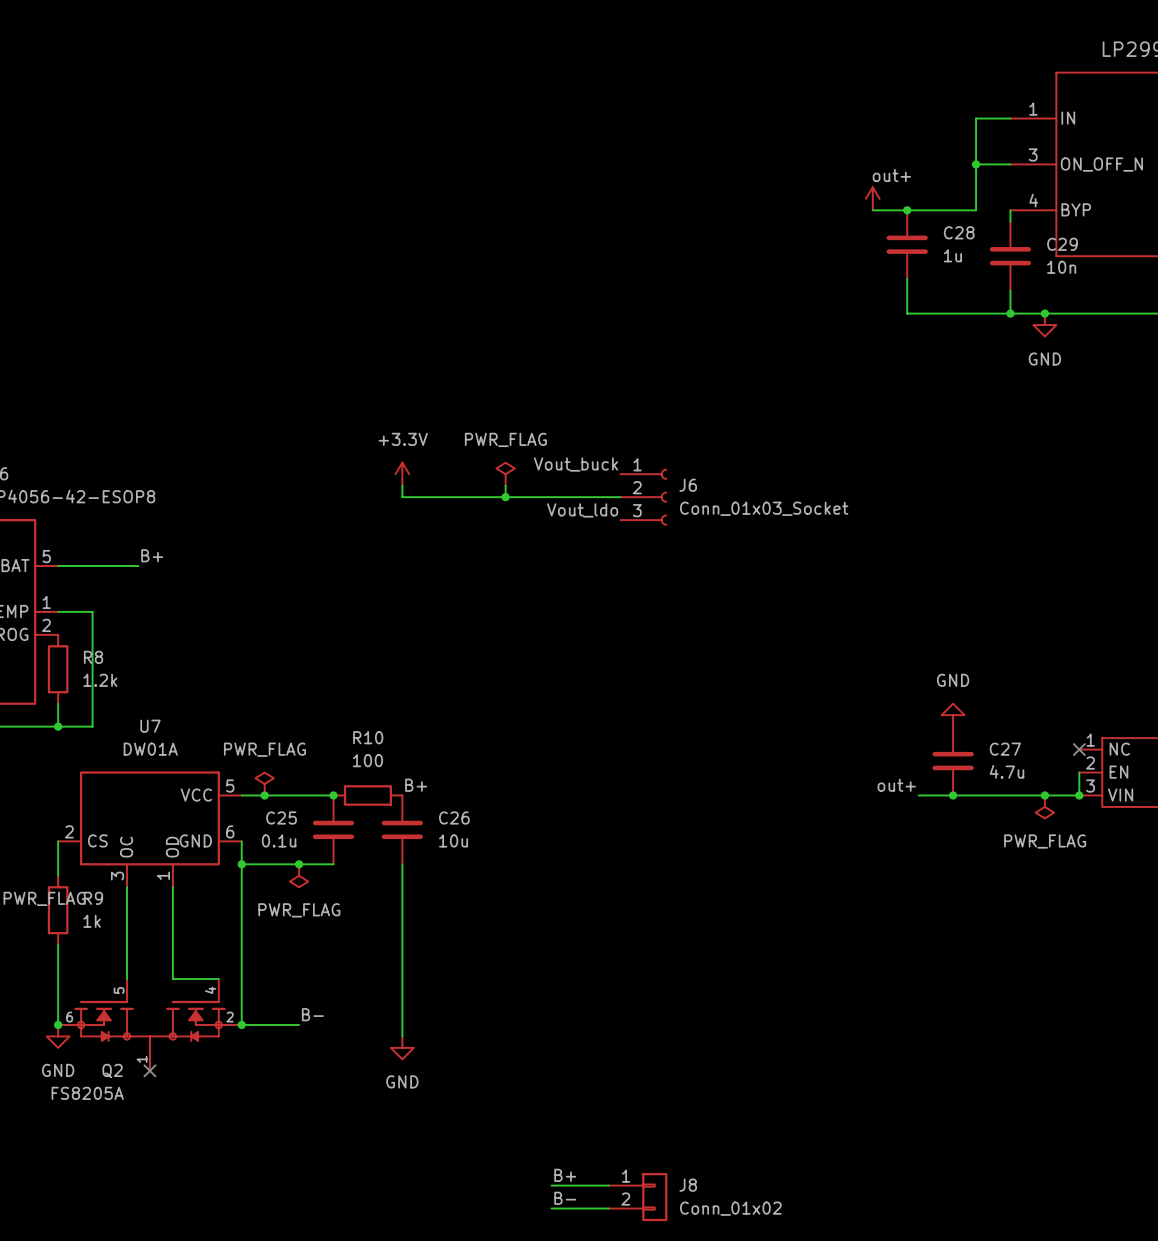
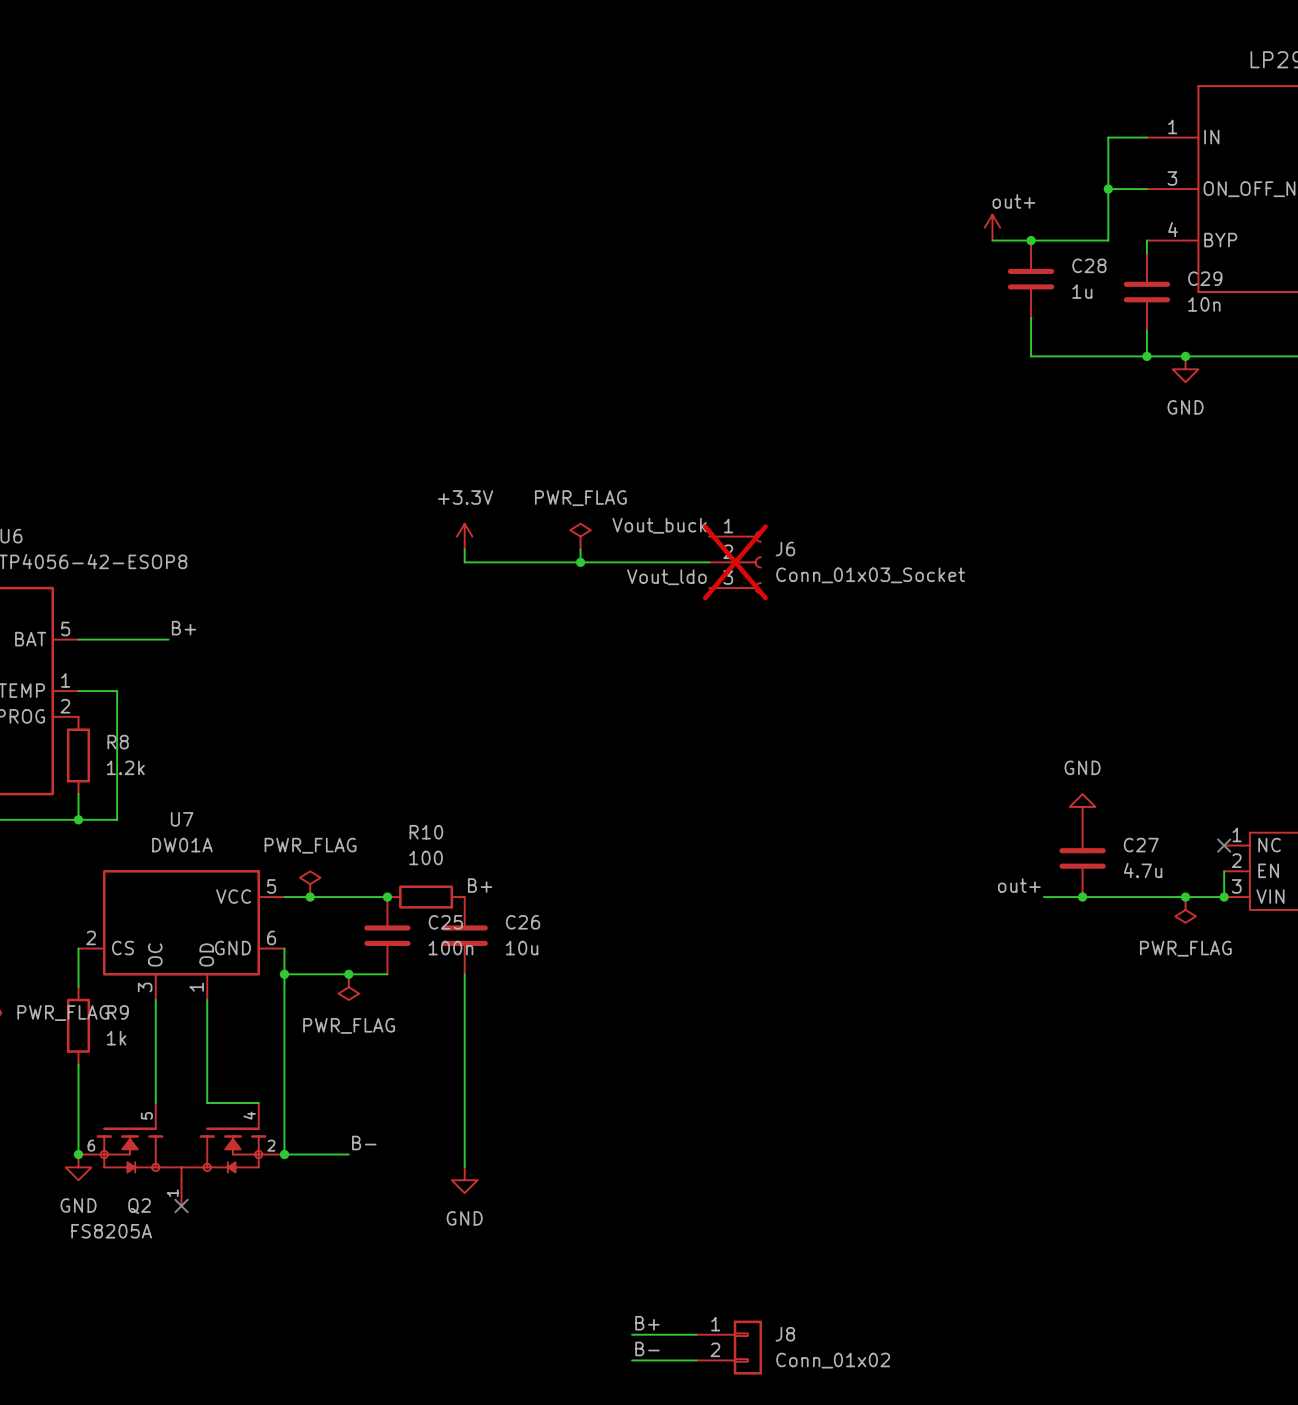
J6 do-not-place cross: none -> (735, 562)
C25 name position: C25 (281, 818) -> C25 (445, 922)
C25 value: 0.1u (279, 840) -> 100n (451, 948)

